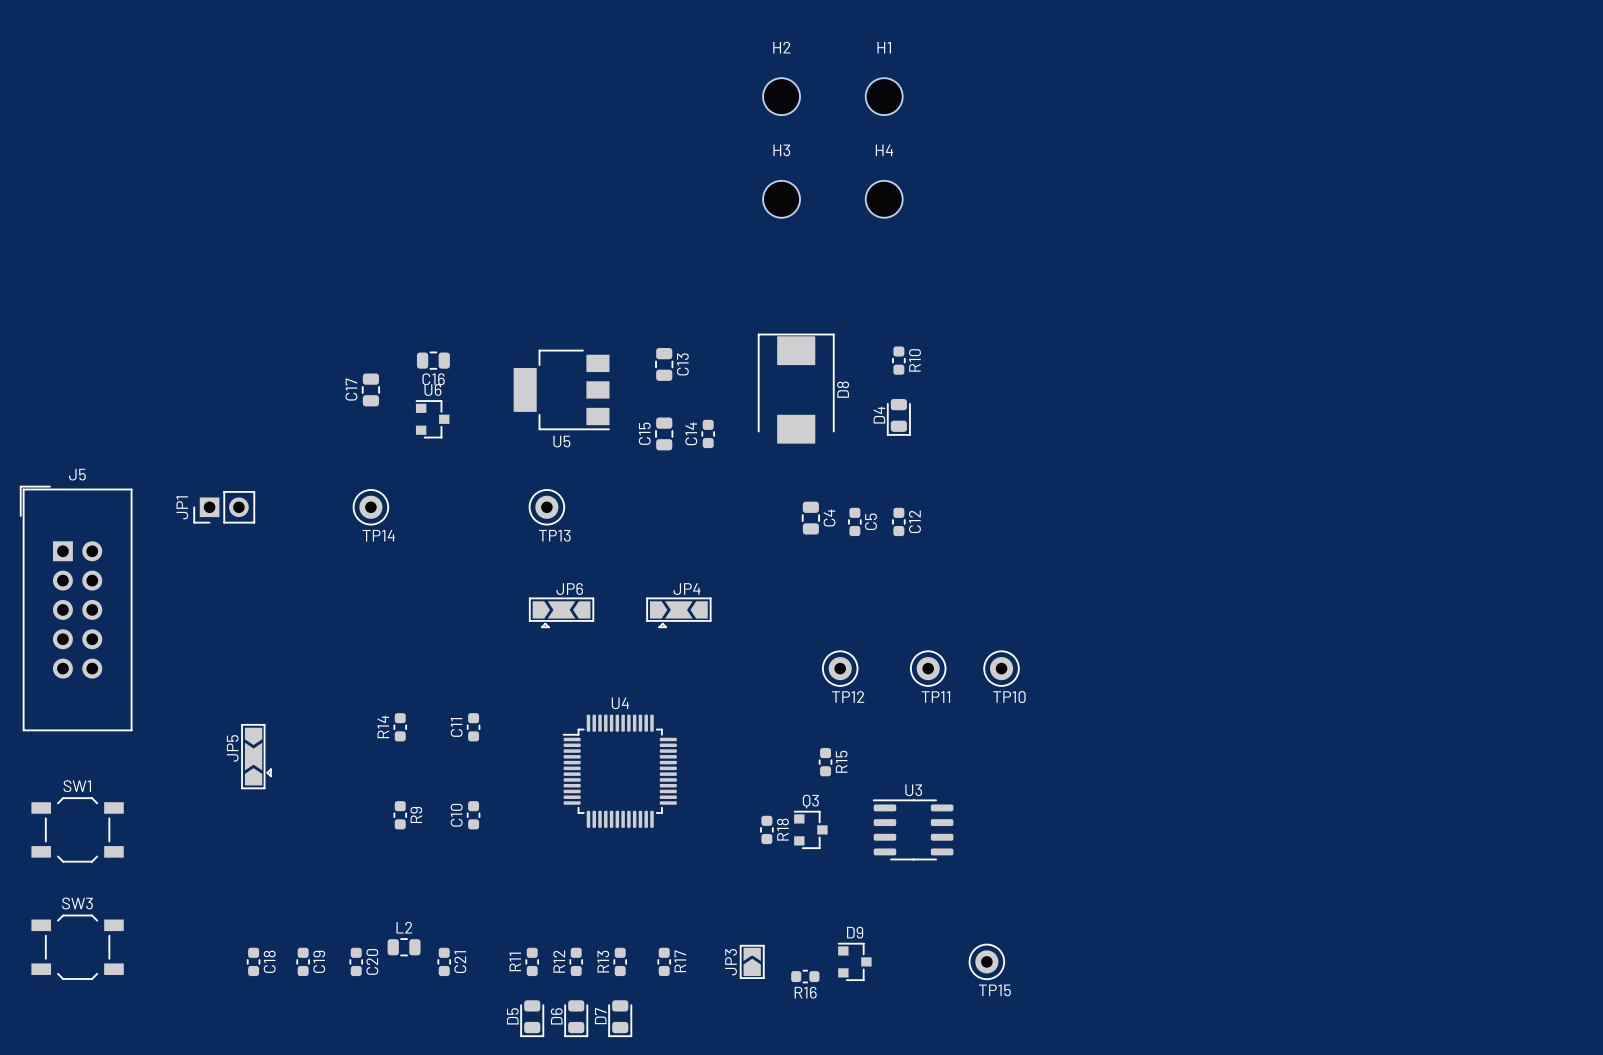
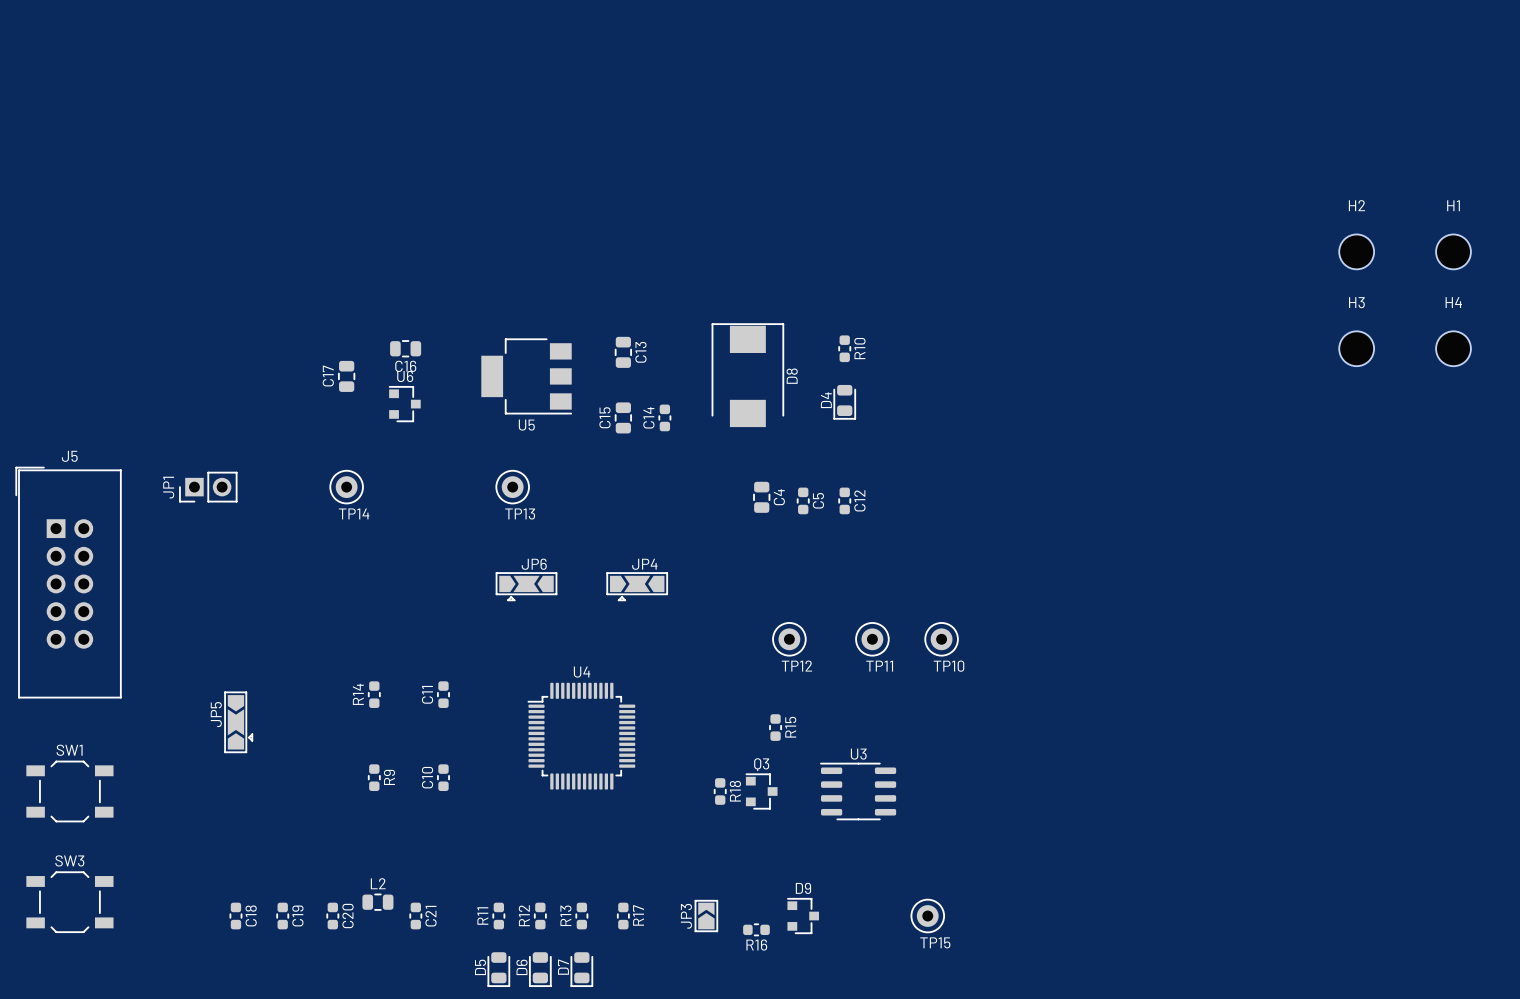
H2 position: (781, 96) -> (1356, 251)
H1 position: (884, 96) -> (1453, 251)
H3 position: (781, 199) -> (1356, 348)
H4 position: (884, 199) -> (1453, 348)

